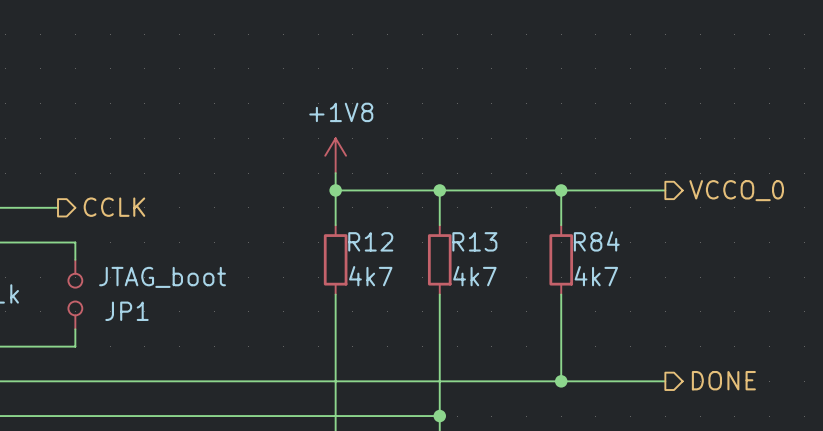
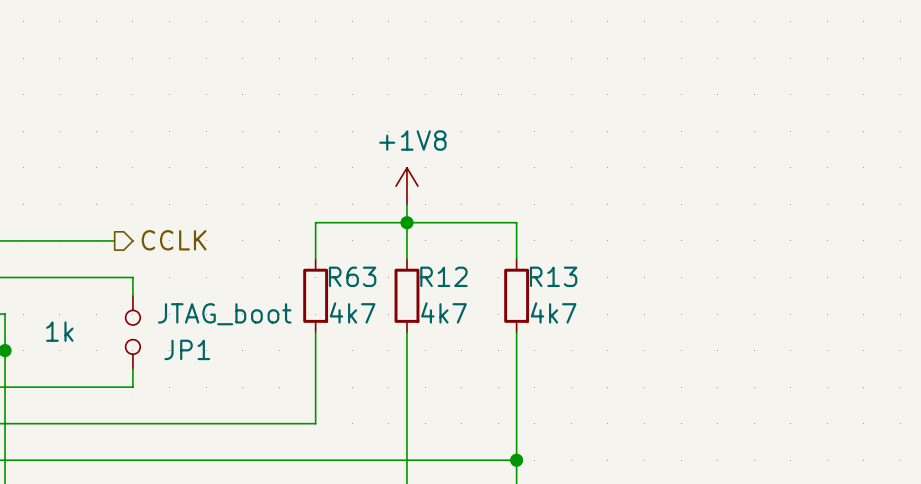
wire: none -> (406, 222) (315, 222) (315, 259)
wire: (439, 190) (665, 190) -> none
junction: (439, 190) -> none
wire: (561, 190) (561, 225) -> none
junction: (561, 190) -> none
hierarchical label: VCCO_0 (736, 190) -> none
R63: none -> 4k7 (315, 295)
R84: 4k7 (561, 259) -> none
wire: (561, 294) (561, 381) -> none
hierarchical label: DONE (723, 380) -> none
wire: (248, 381) (665, 381) -> (315, 423) (315, 332)
junction: (561, 381) -> none

